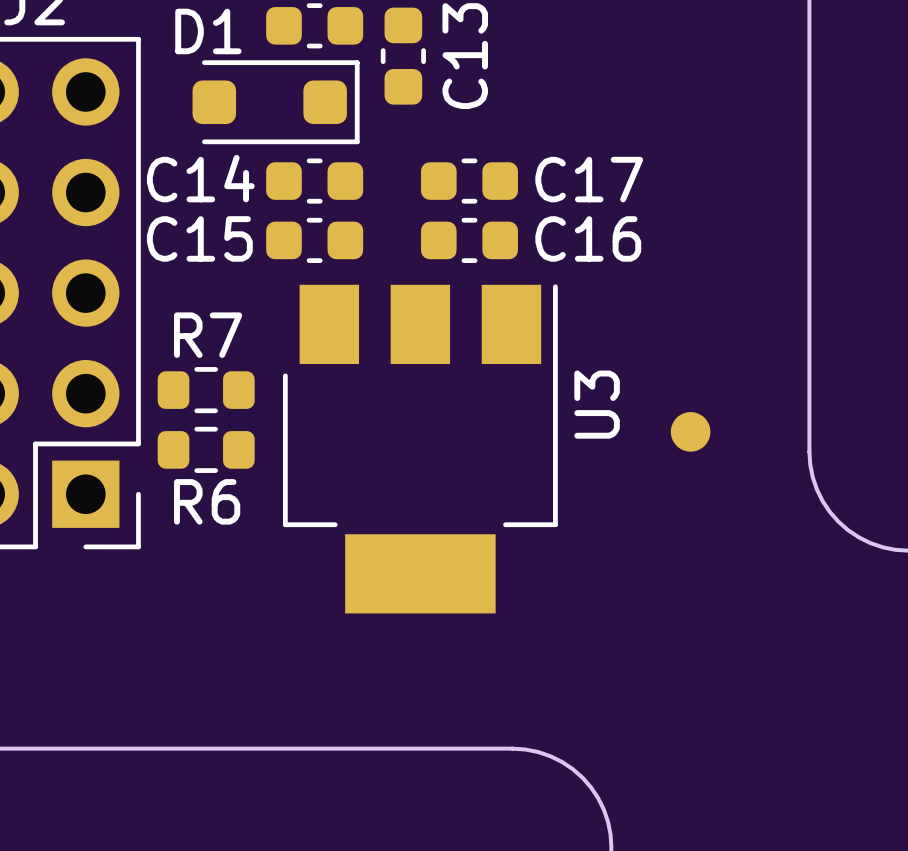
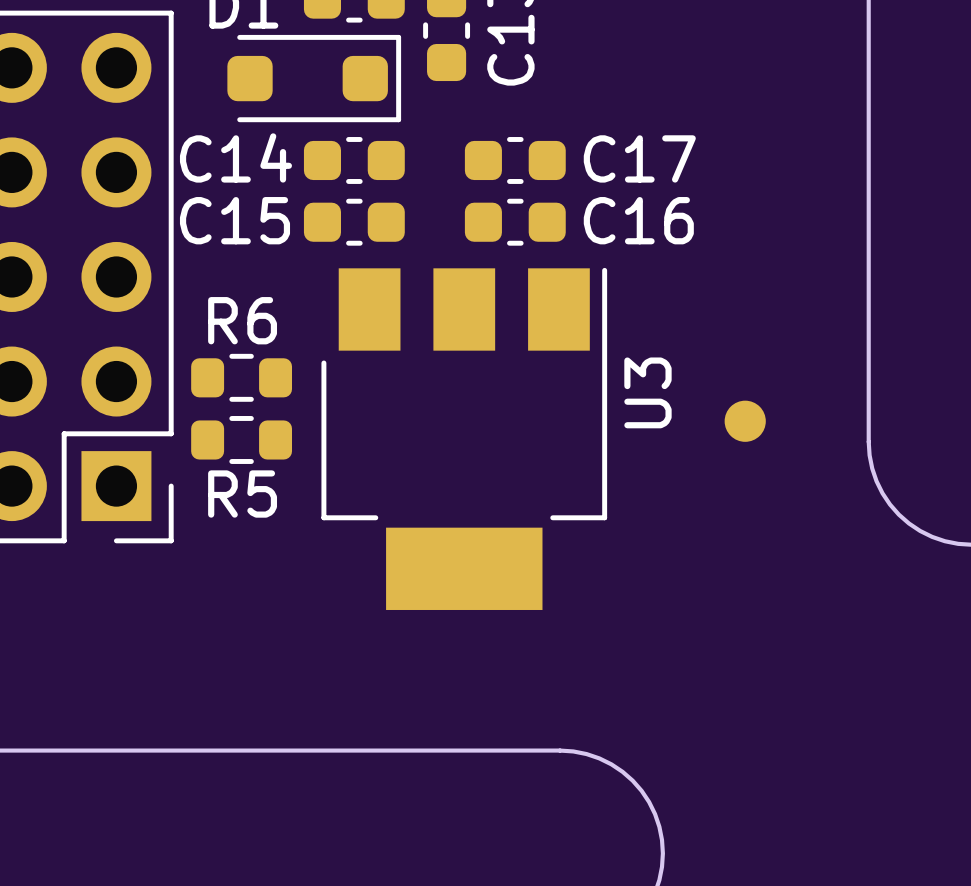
R7 name: R7 (208, 335) -> R6 (242, 320)
R6 name: R6 (207, 501) -> R5 (242, 494)

